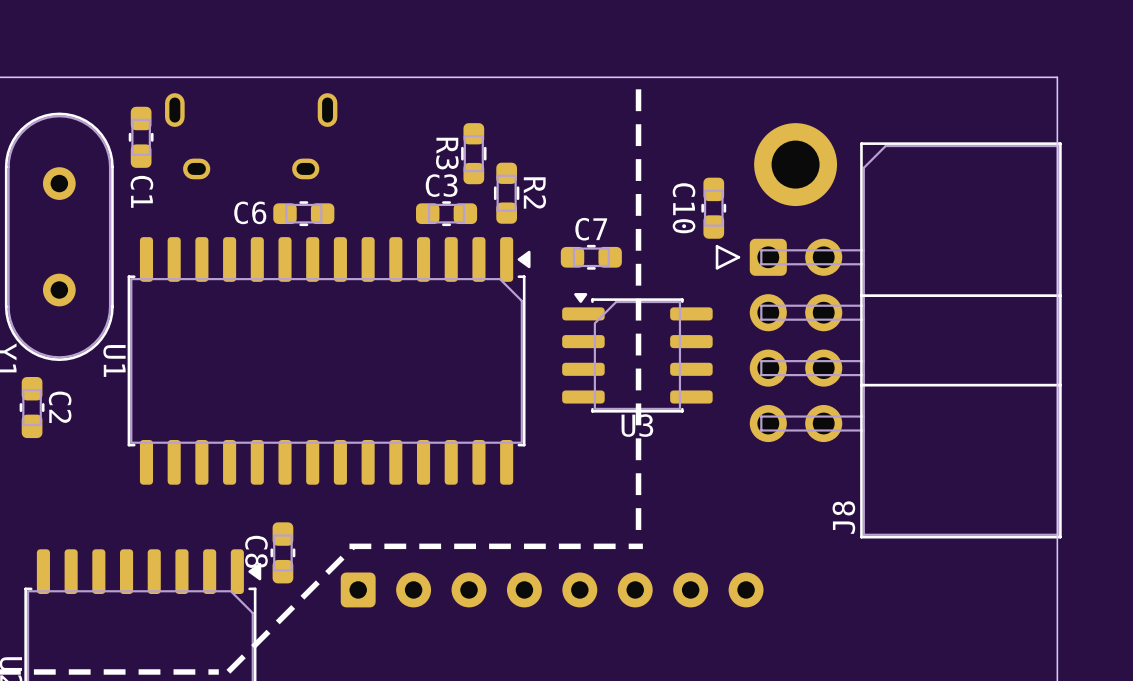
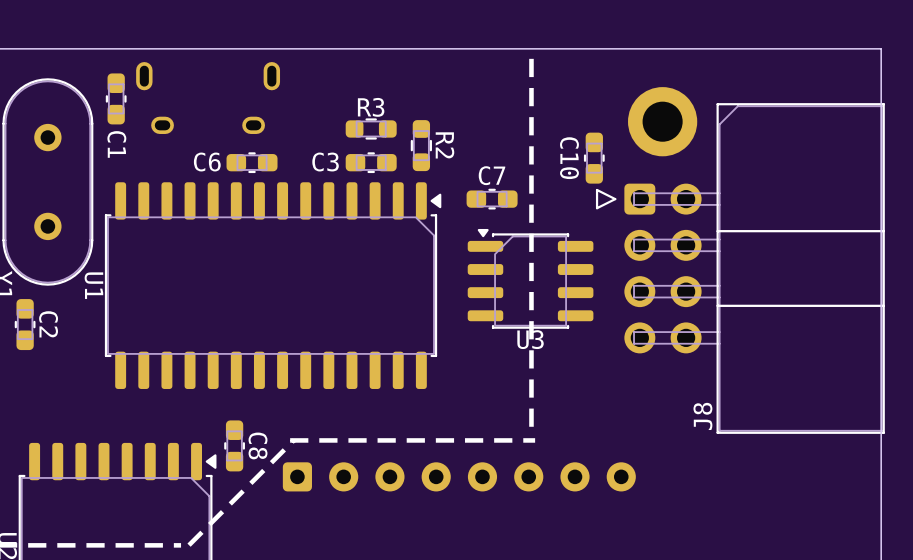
R3 rotation: 0° (473, 153) -> 90° clockwise (371, 128)
C3 name position: C3 (441, 185) -> C3 (325, 162)
C8 name position: C8 (256, 551) -> C8 (258, 445)

